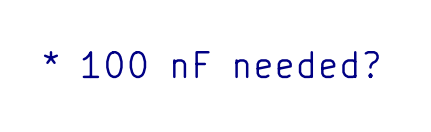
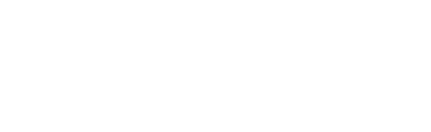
text: * 100 nF needed? (211, 64) -> none

